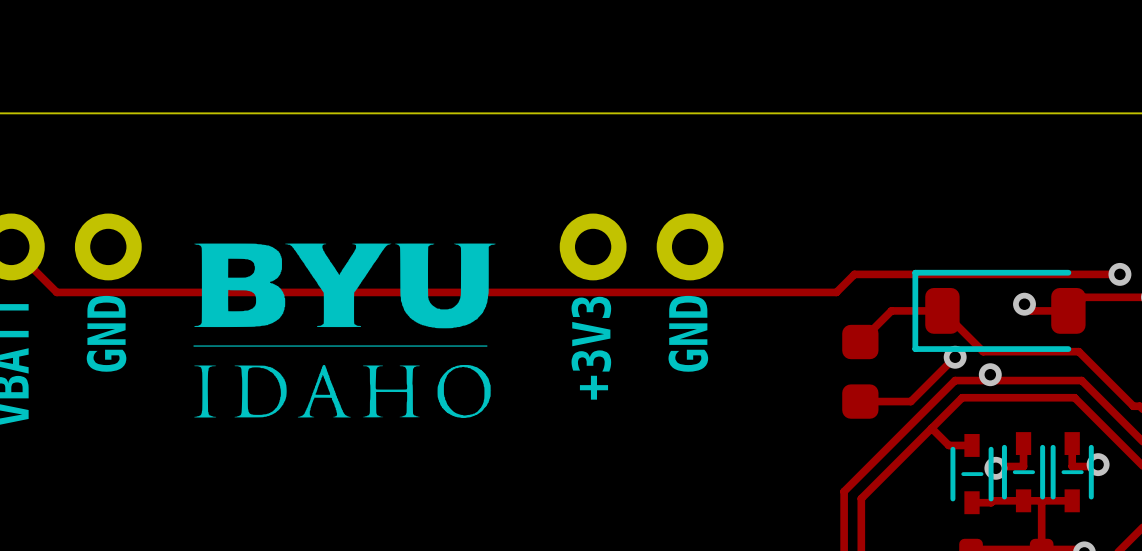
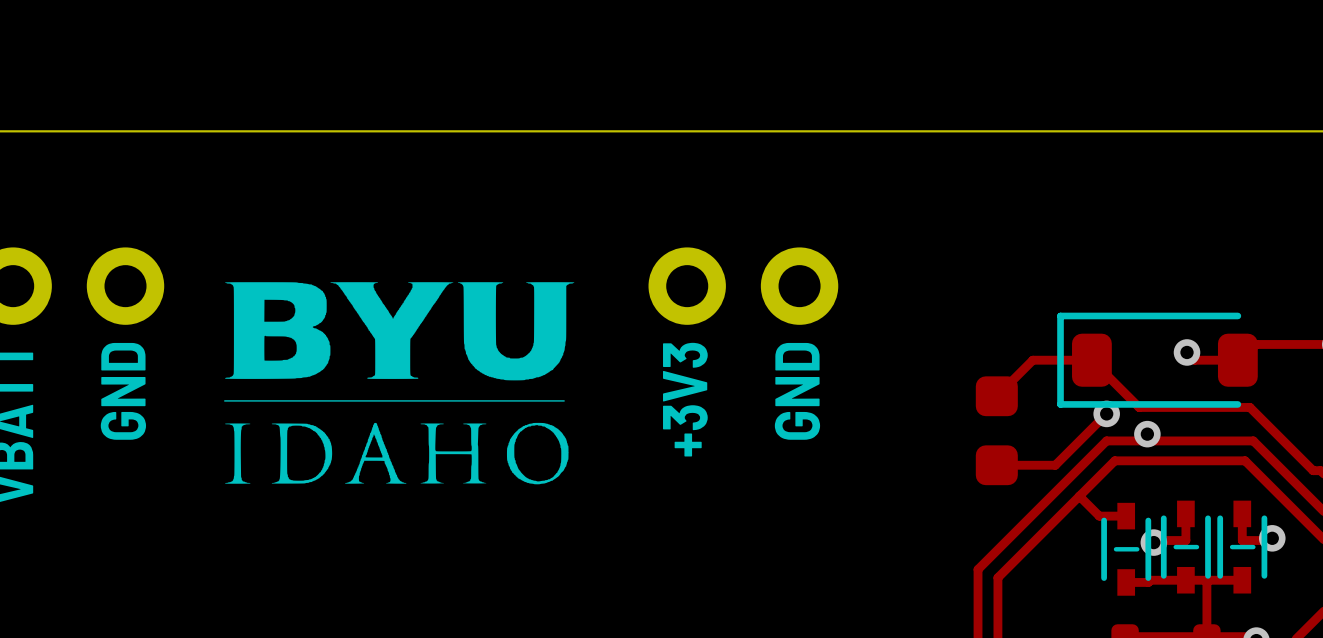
track: (11, 246) (56, 292) (836, 292) (854, 274) (1119, 274) -> none
via: (1119, 274) -> none

